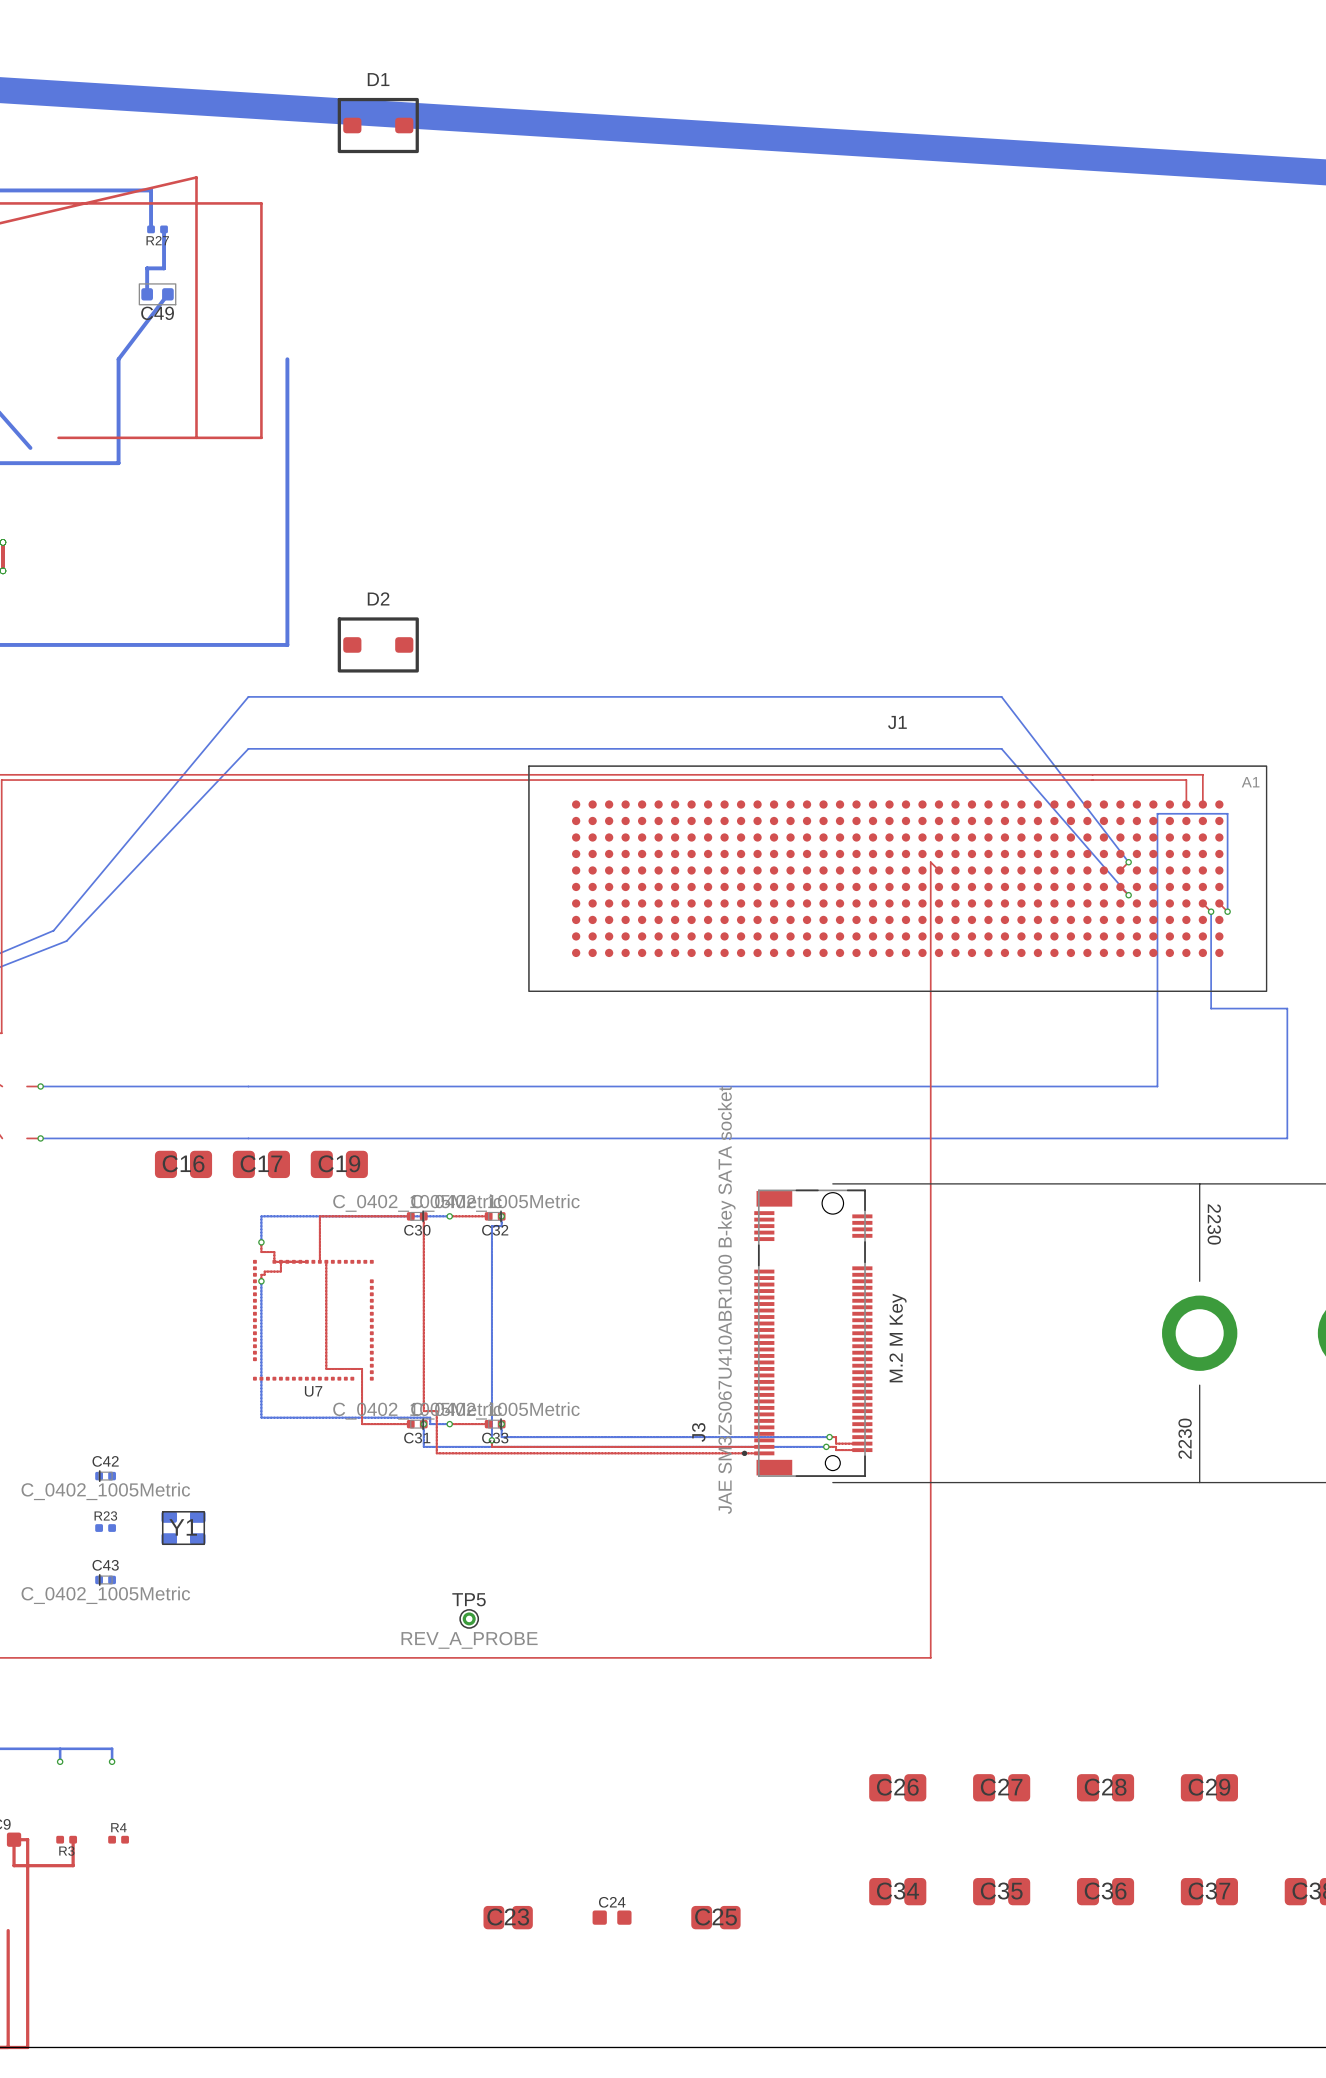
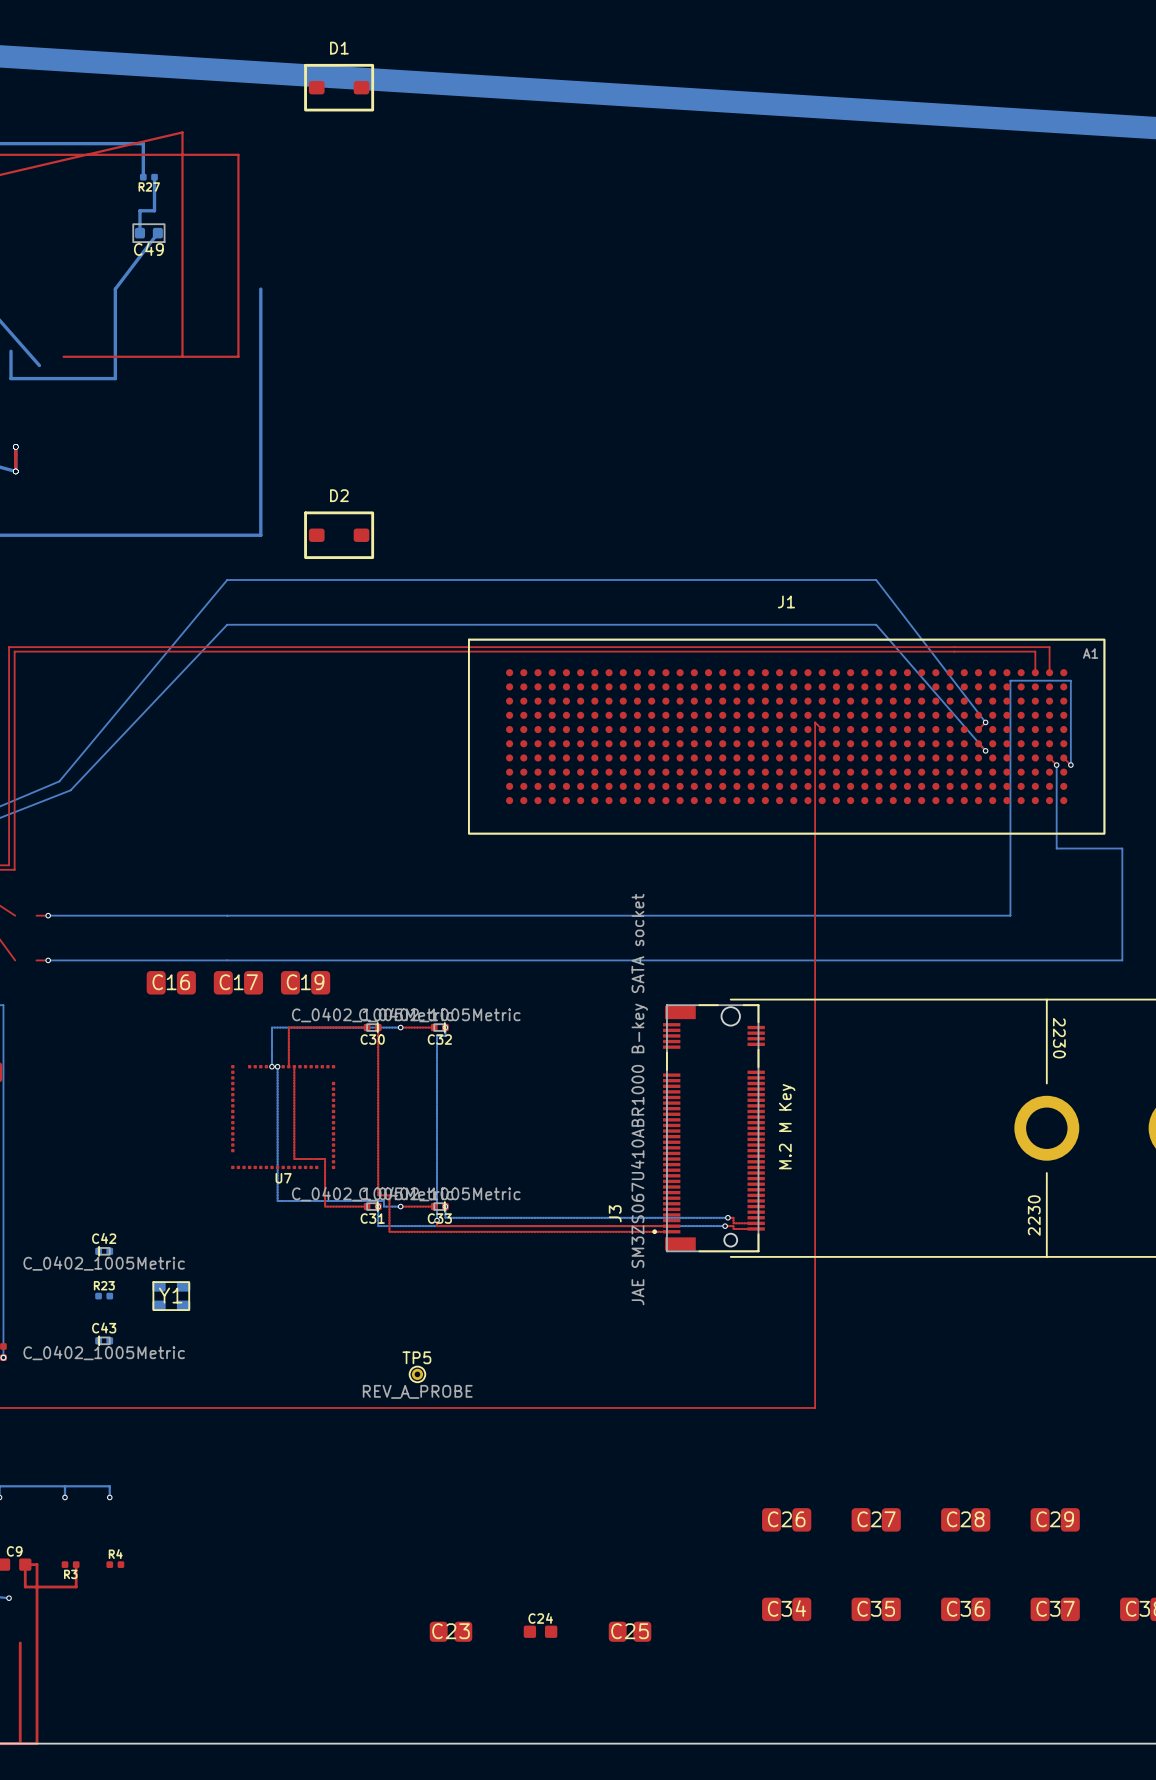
bottom track: (300, 1216) (261, 1216) (261, 1242) -> (271, 1027) (271, 1066)
top track: (261, 1242) (261, 1252) (274, 1252) (274, 1261) (306, 1261) -> none
via: (261, 1242) -> none
top track: (280, 1261) (280, 1271) (264, 1271) (264, 1274) (261, 1274) (261, 1281) -> none
via: none -> (271, 1066)
via: none -> (277, 1066)
bottom track: (261, 1281) (261, 1417) (306, 1417) -> (277, 1066) (277, 1200)
via: (261, 1281) -> none

